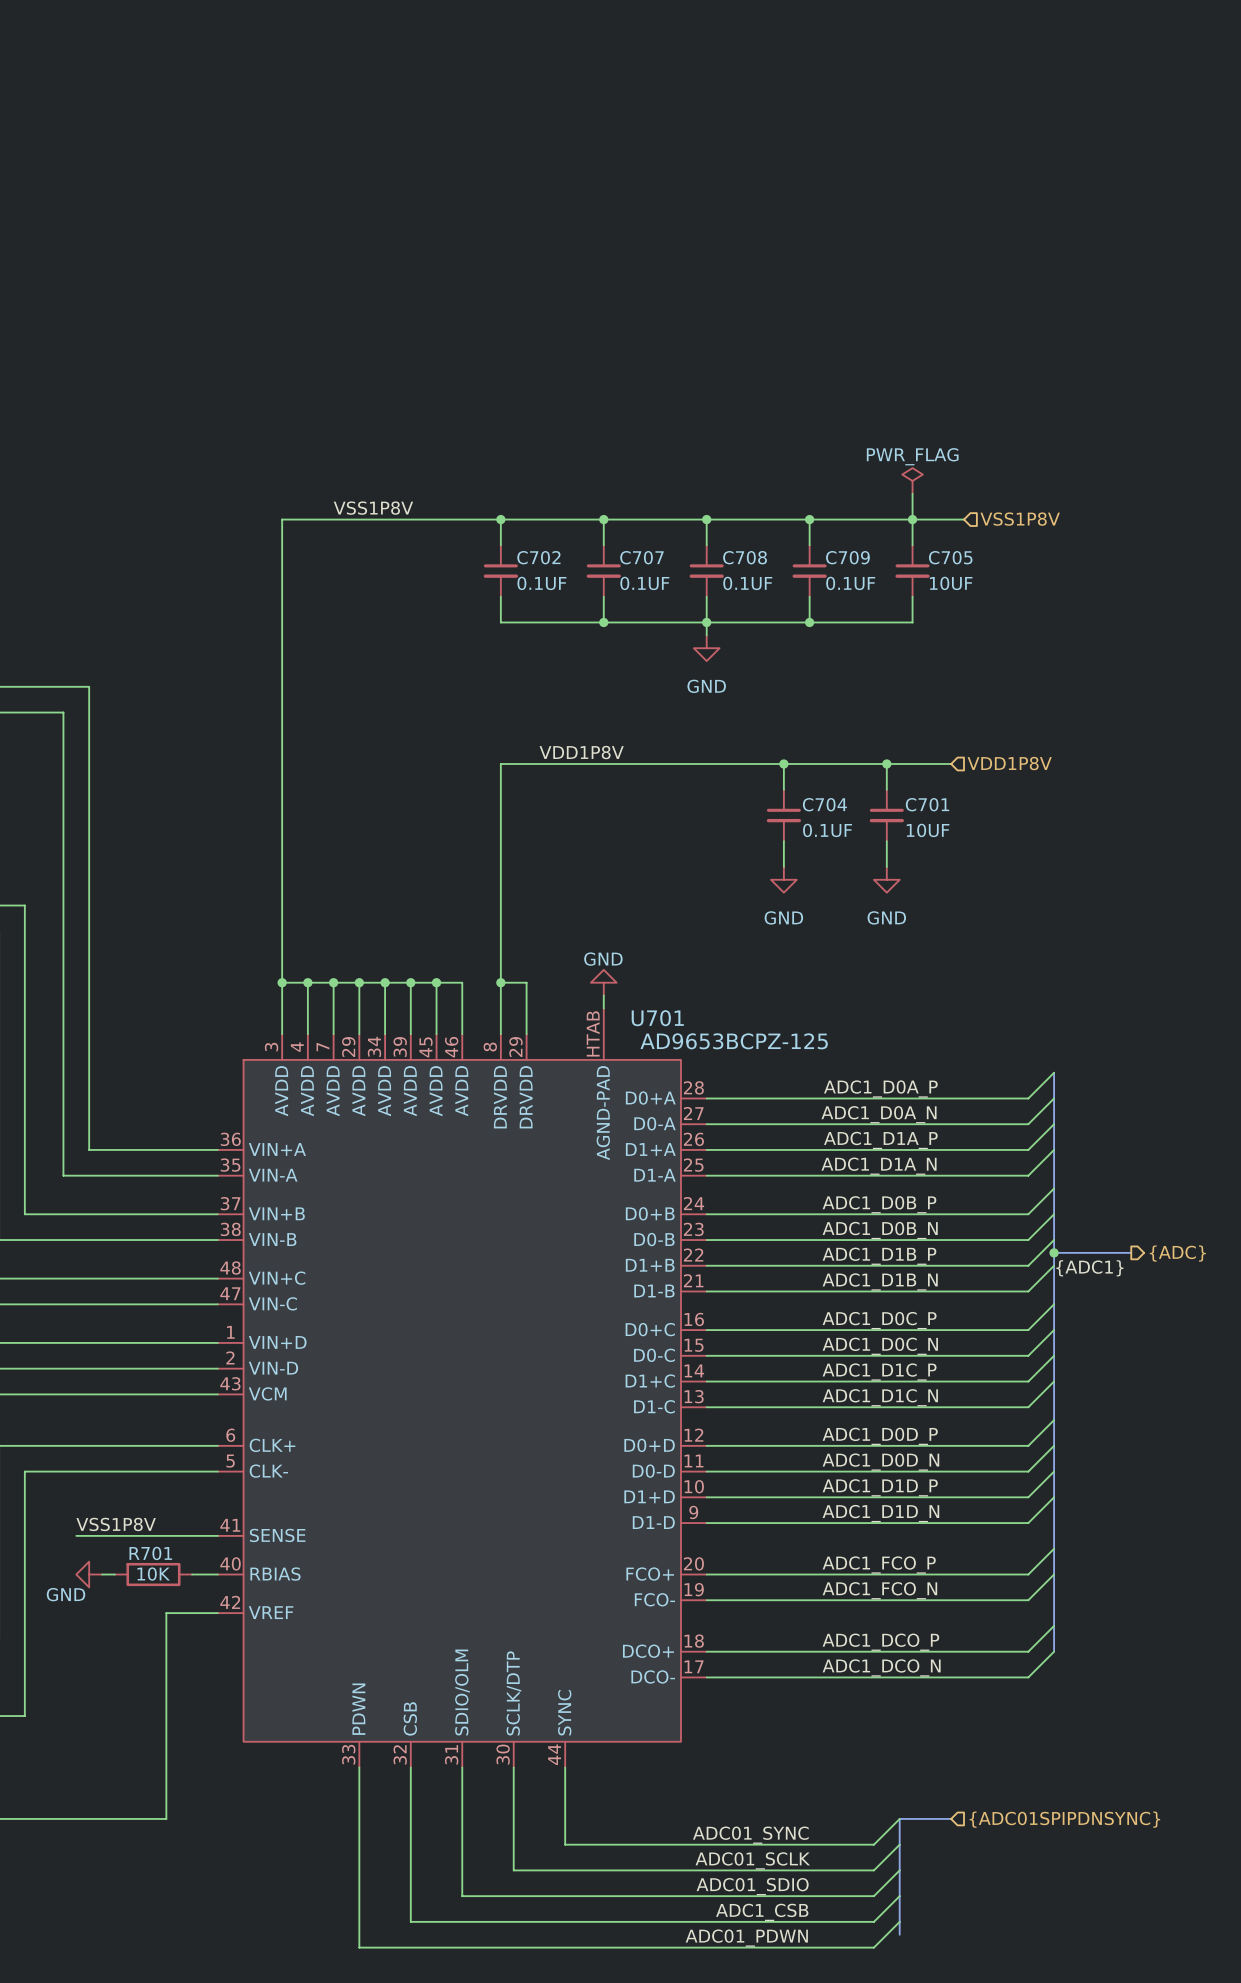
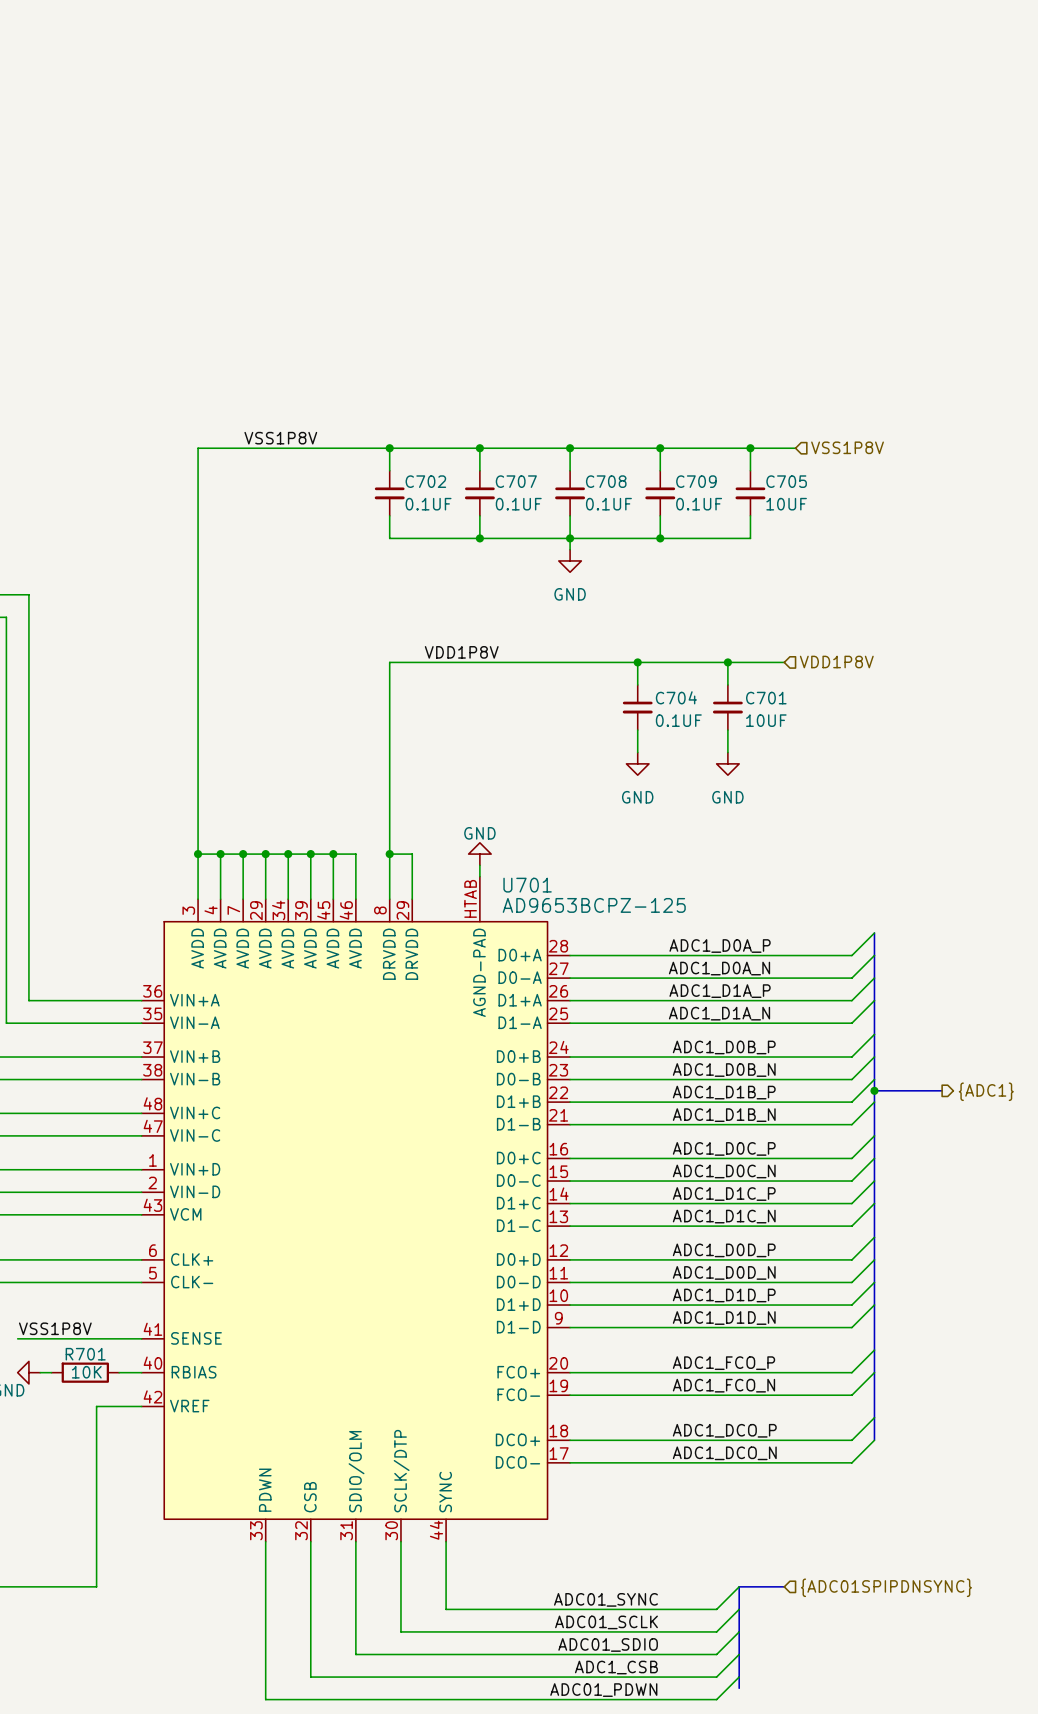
power symbol: PWR_FLAG (912, 480) -> none
wire: (912, 493) (912, 519) -> none
hierarchical label: {ADC} (1177, 1253) -> {ADC1} (986, 1091)
label: {ADC1} (1089, 1268) -> none

